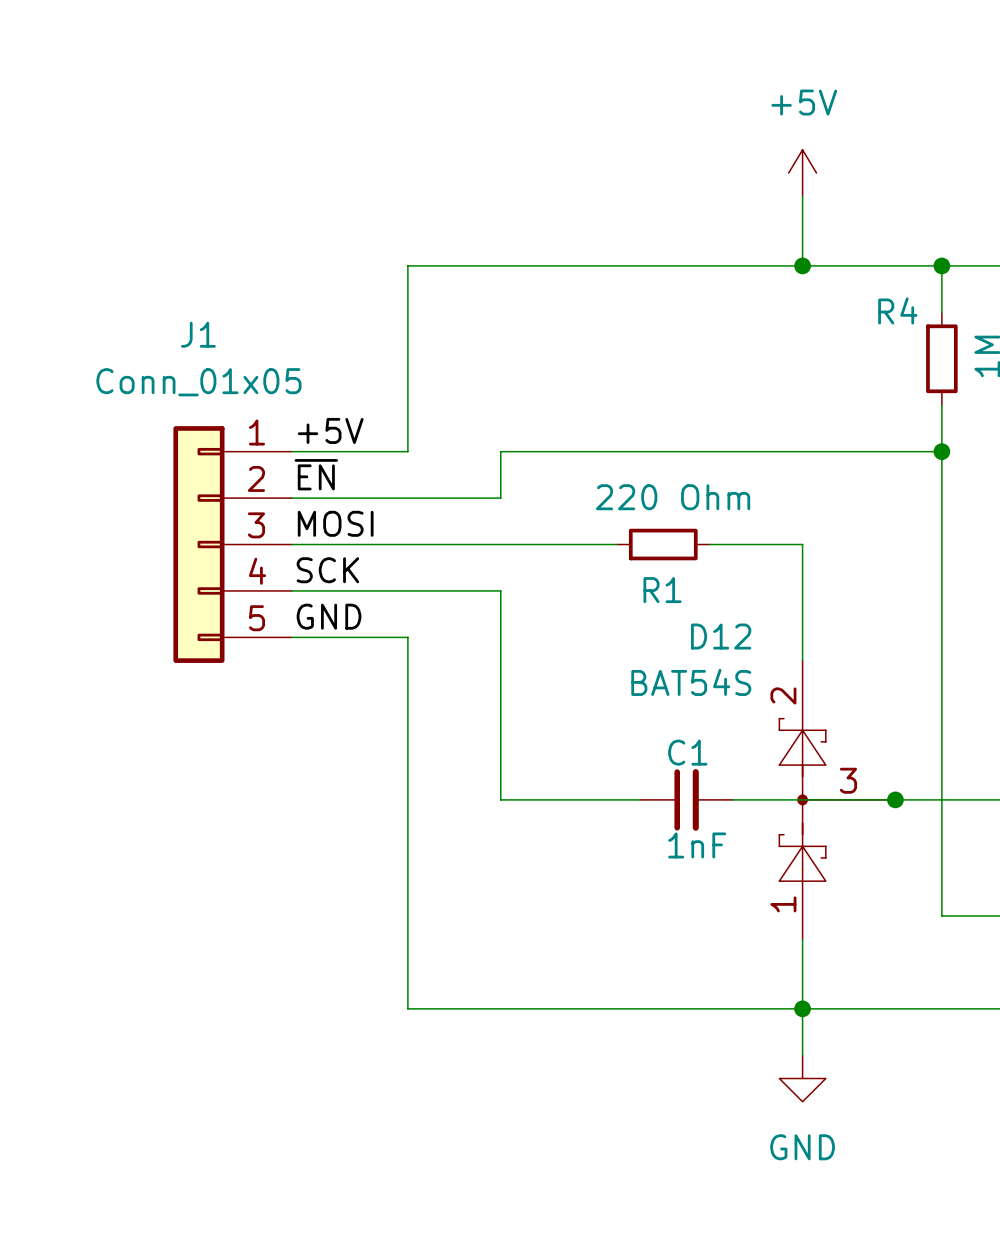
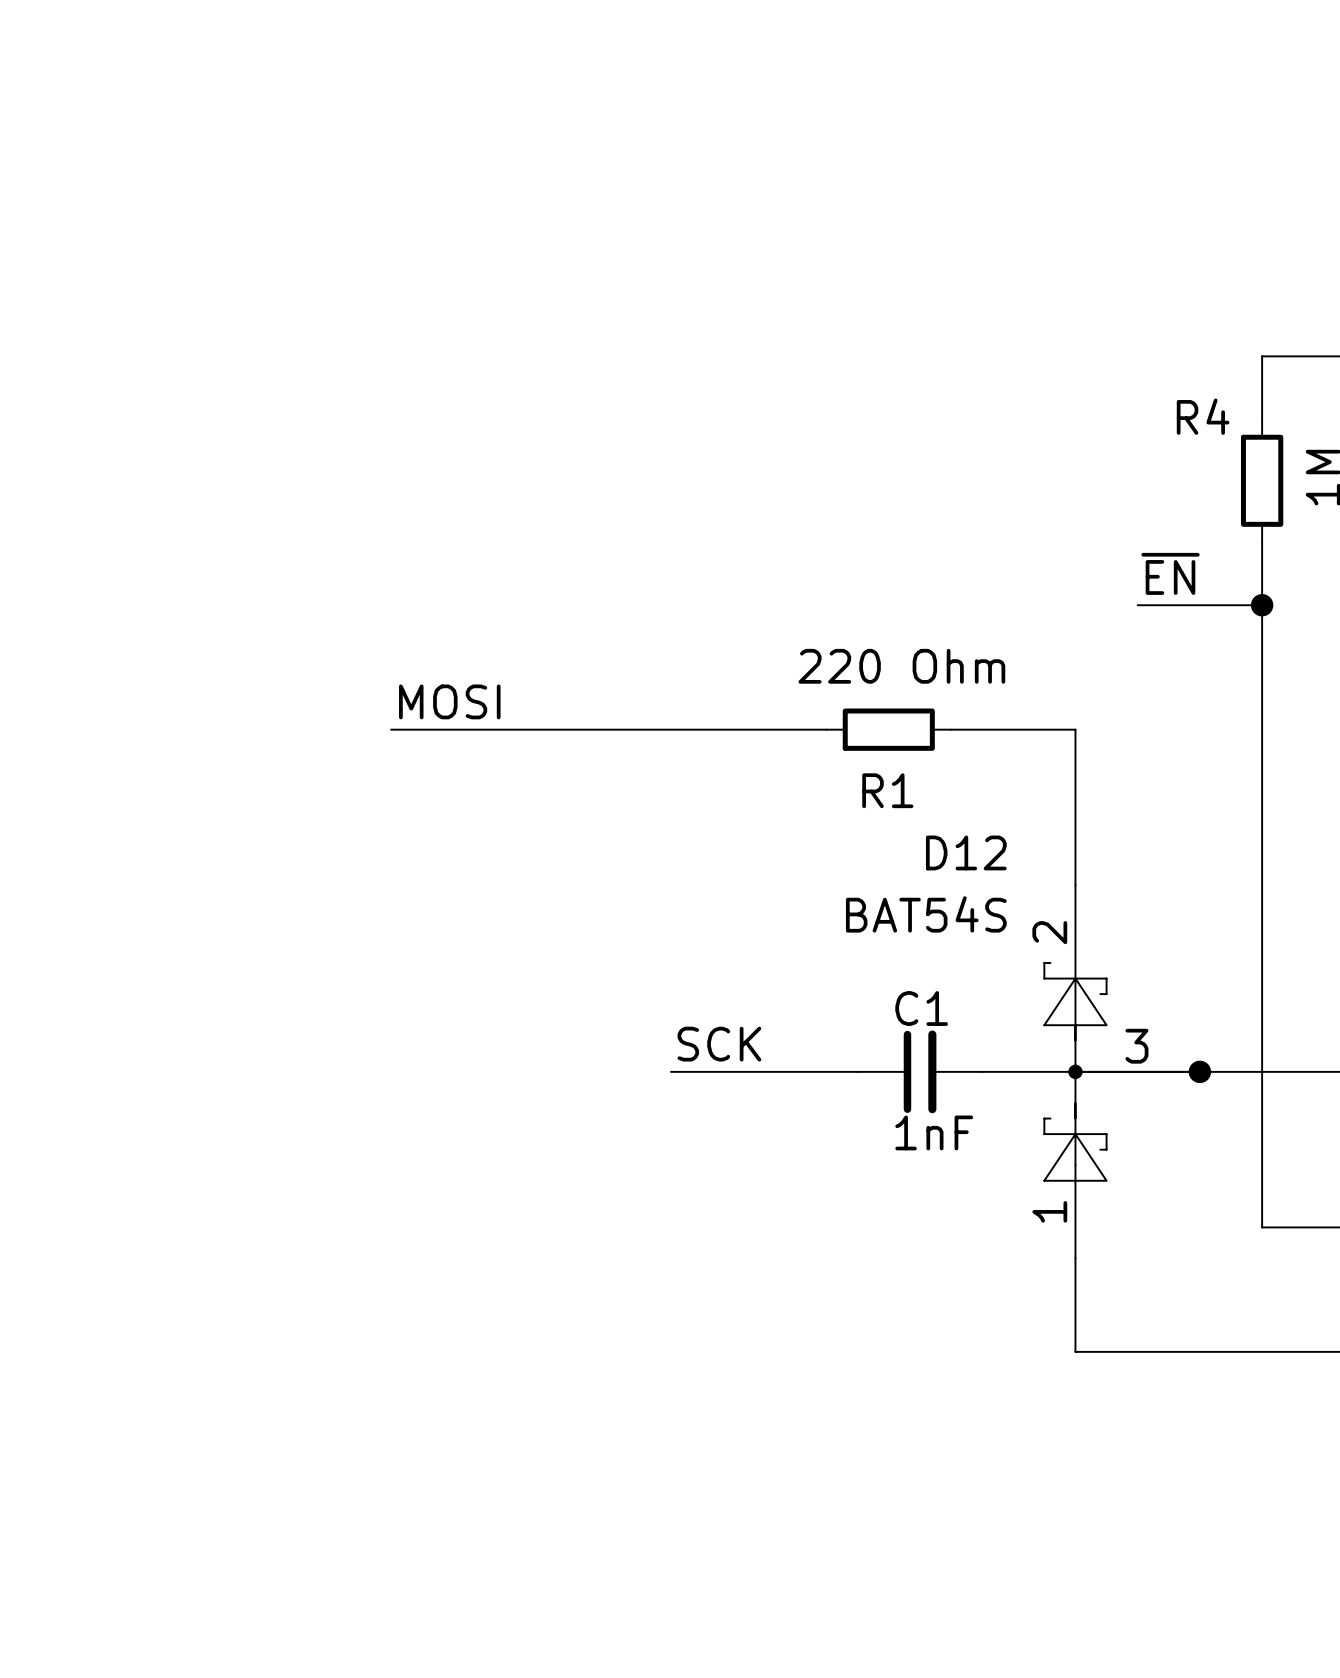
power symbol: +5V (802, 173) -> none
wire: (802, 196) (802, 265) -> none
junction: (802, 265) -> none
wire: (941, 265) (407, 265) (407, 451) (291, 451) -> none
junction: (941, 265) -> none
label: none -> ~{EN} (1170, 573)
label: +5V (330, 430) -> none
wire: (849, 451) (500, 451) (500, 498) (291, 498) -> none
label: ~{EN} (316, 474) -> none
J1: Conn_01x05 (232, 544) -> none
label position: SCK (327, 570) -> SCK (719, 1044)
wire: (291, 590) (500, 590) (500, 799) -> none
label: GND (329, 616) -> none
wire: (291, 637) (407, 637) (407, 1008) (802, 1008) (802, 1055) -> none
junction: (802, 1008) -> none
power symbol: GND (802, 1078) -> none

